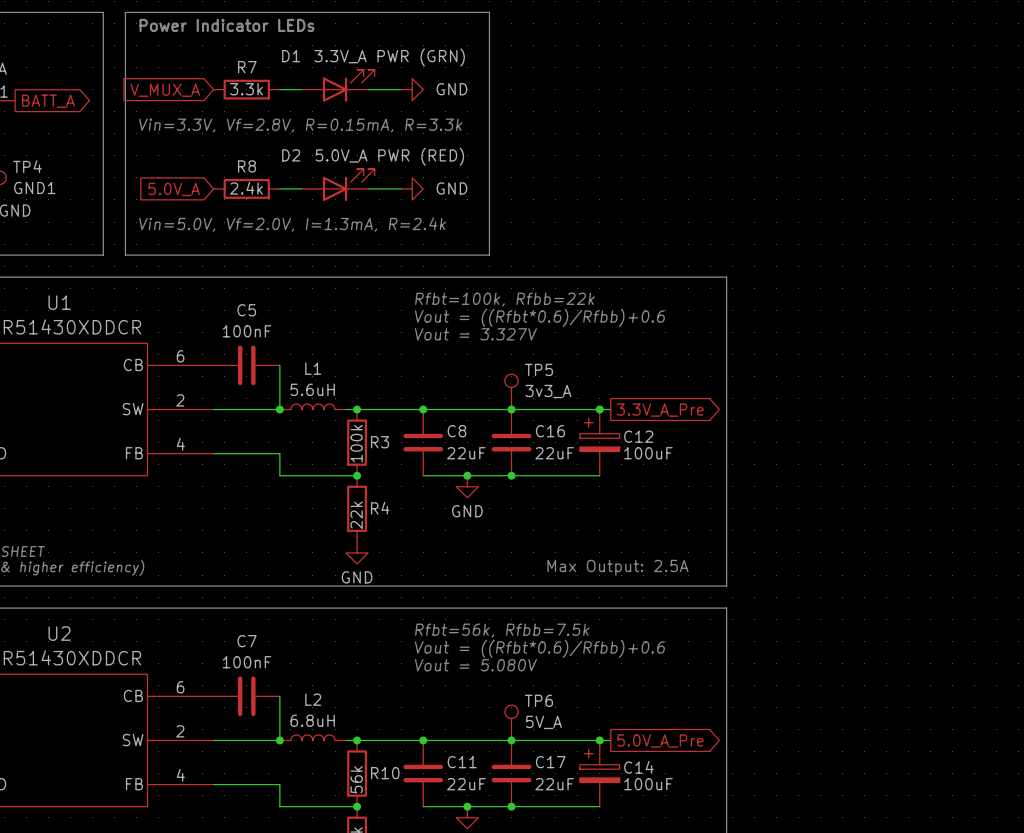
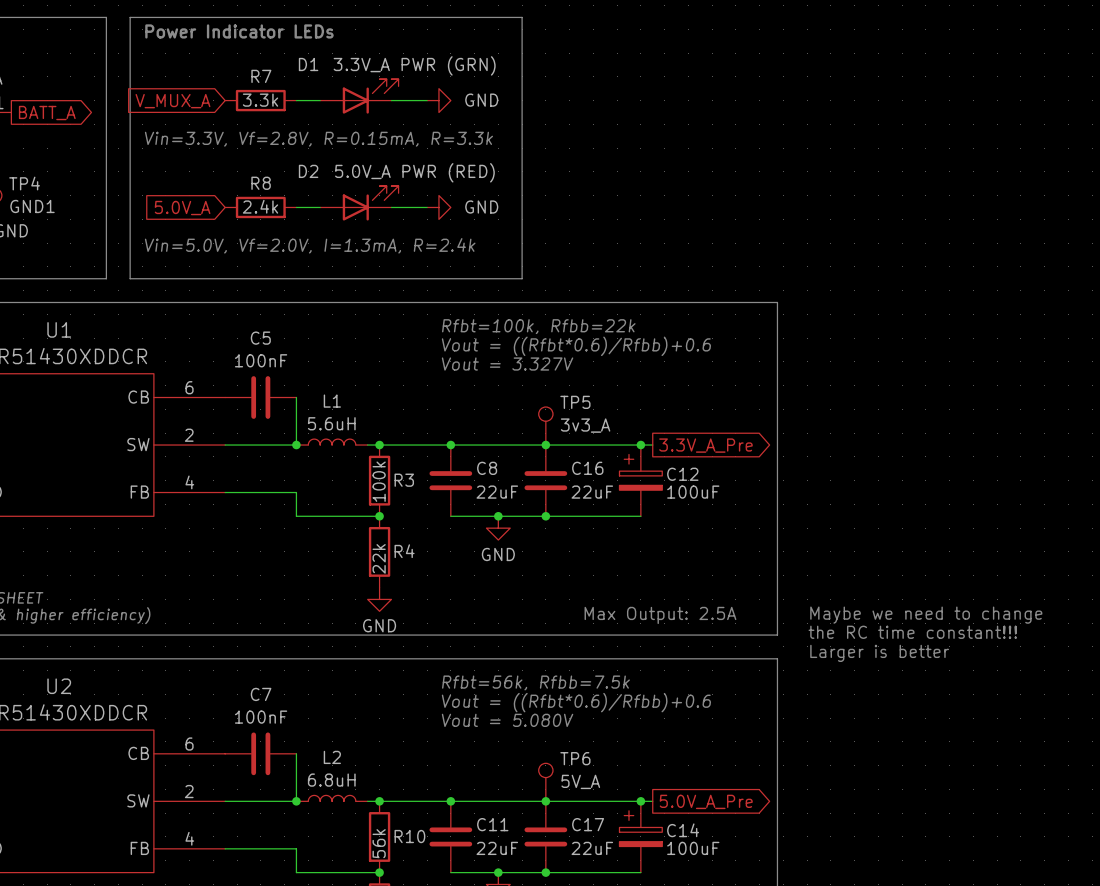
text: none -> Maybe we need to change (926, 615)
text: none -> the RC time constant!!! (912, 632)
text: none -> Larger is better (879, 653)

